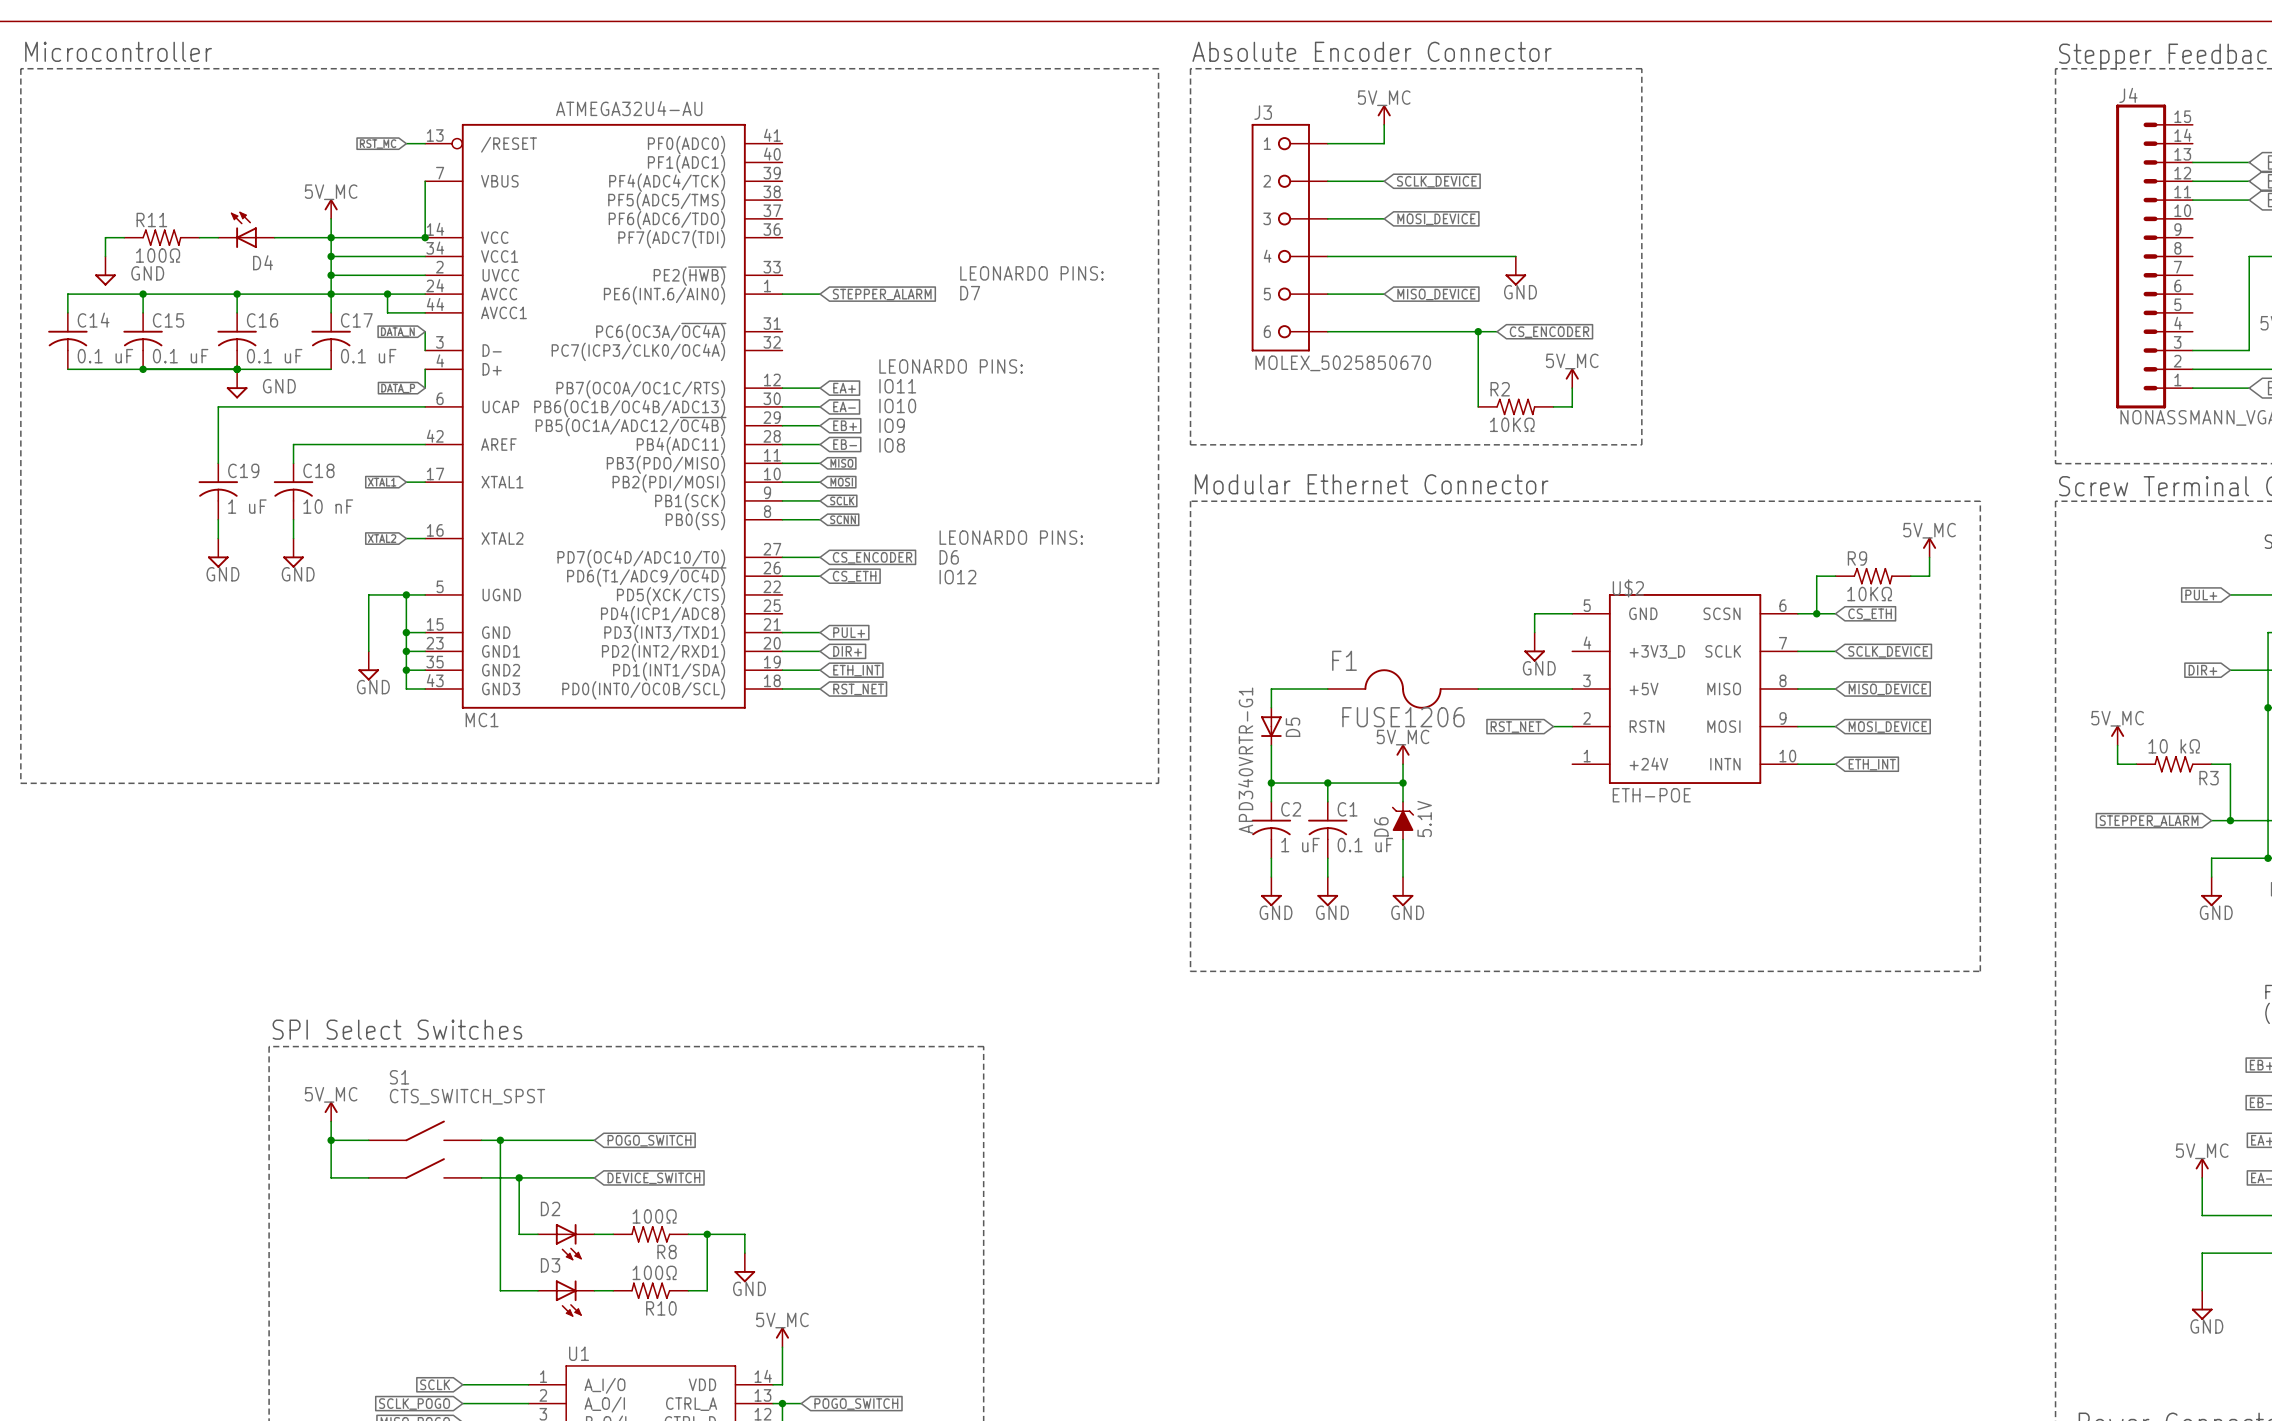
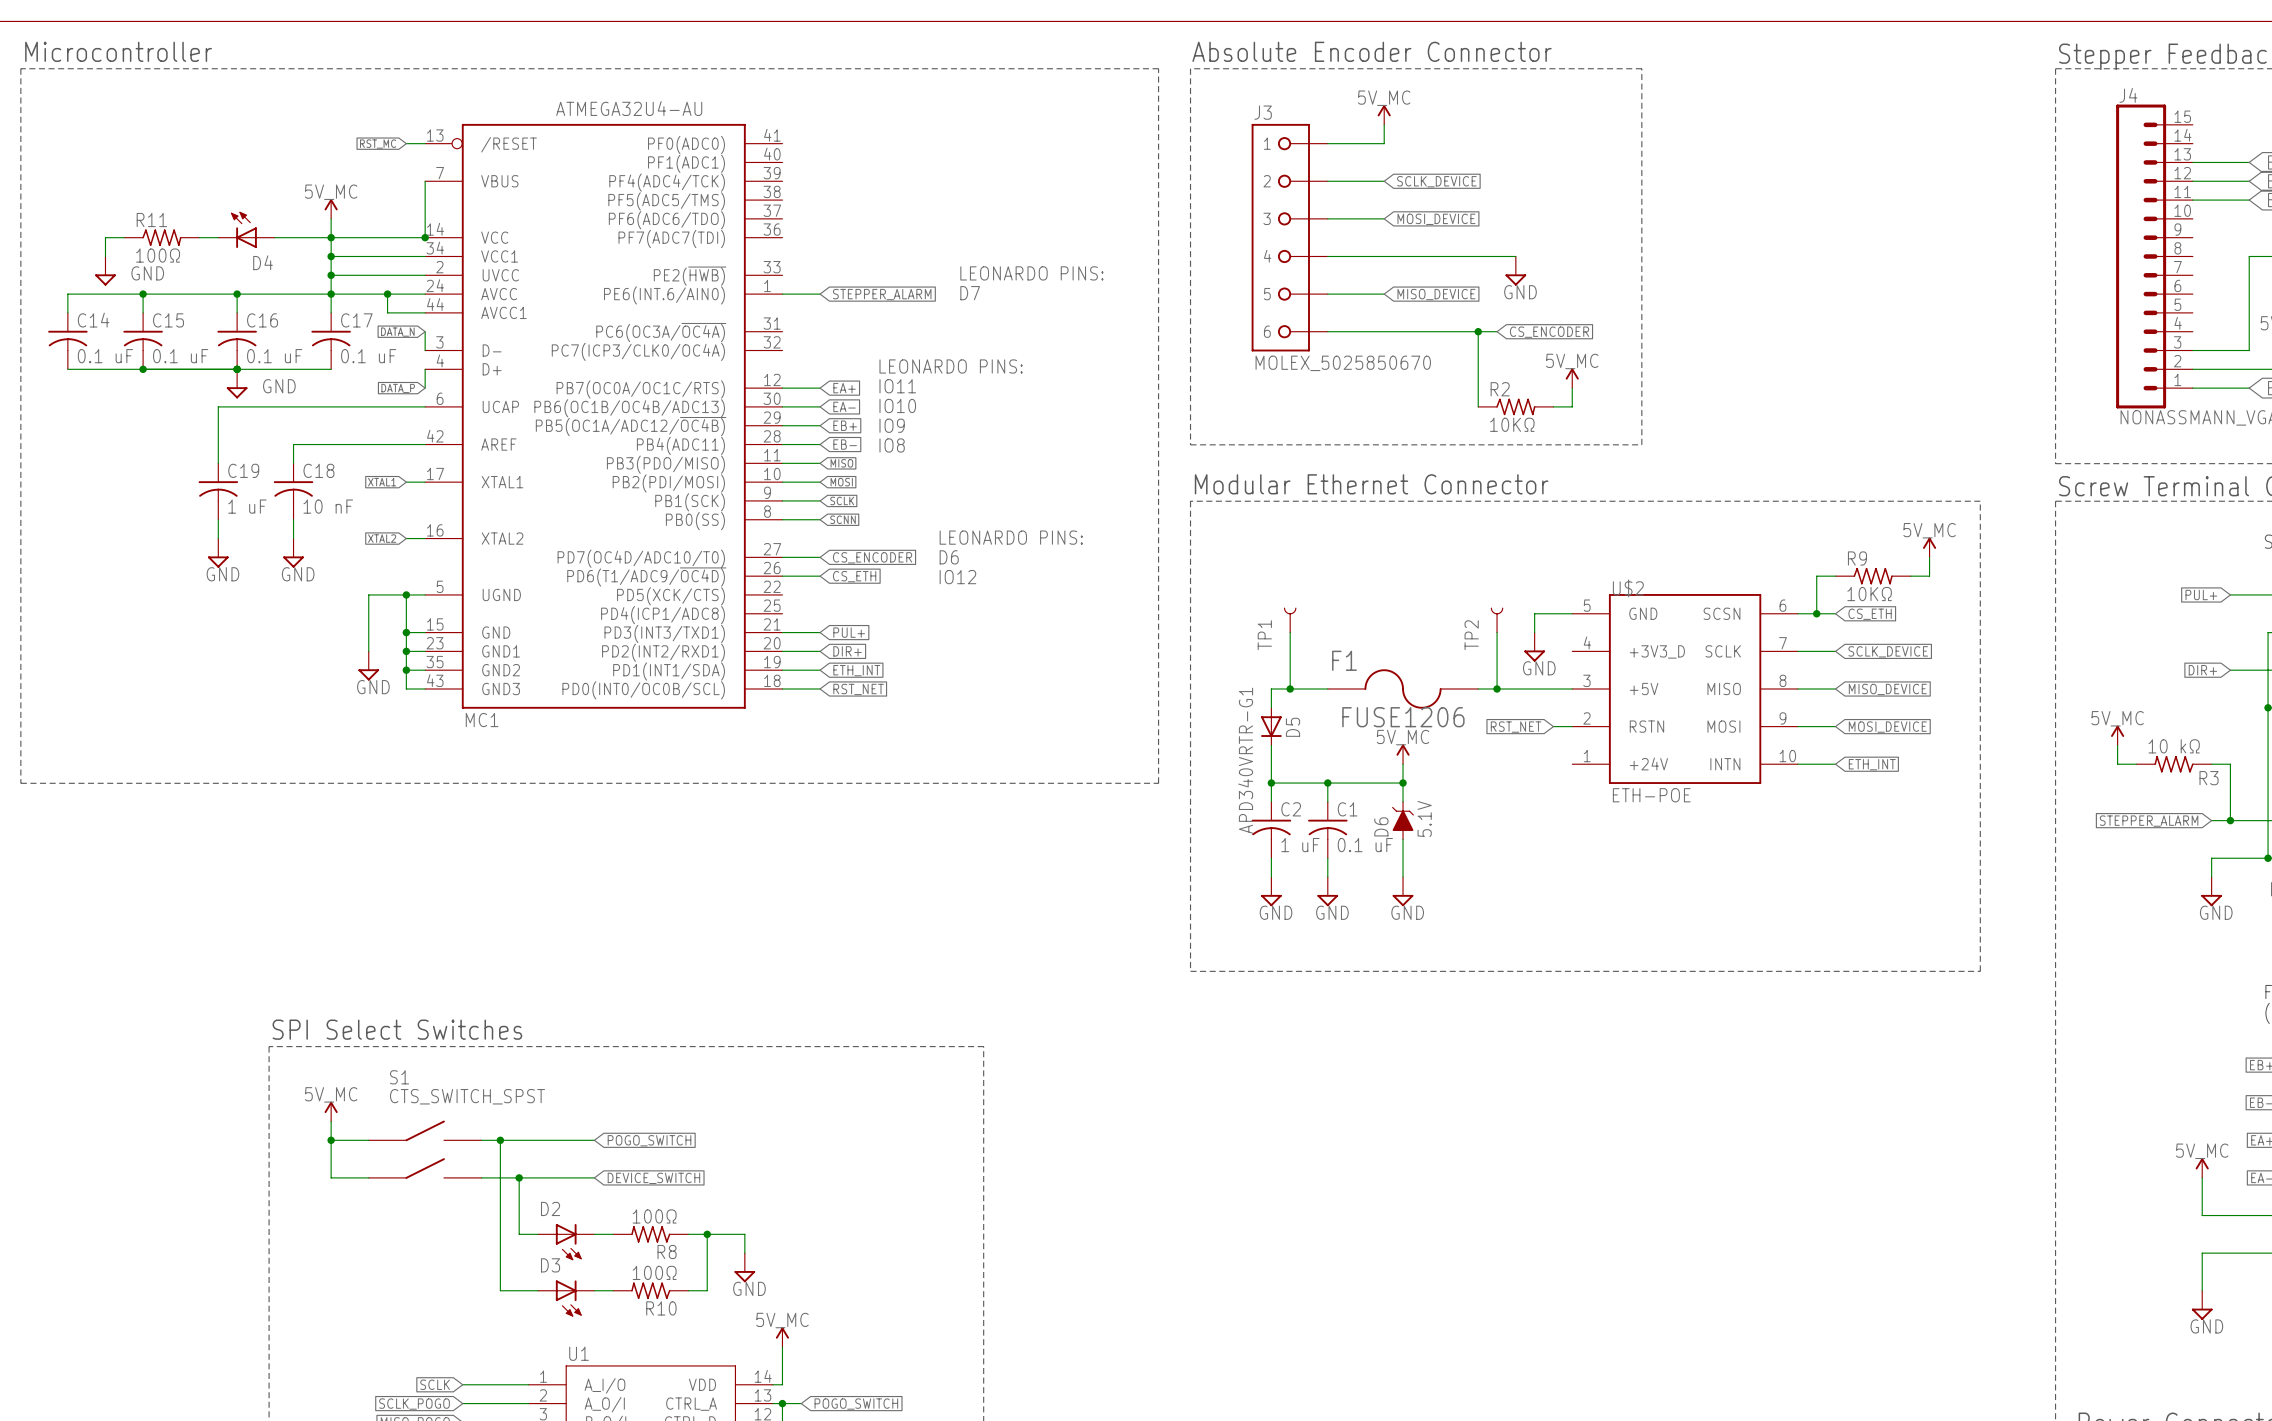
TP1: none -> (1290, 620)
TP2: none -> (1497, 620)
wire: none -> (1290, 632) (1290, 689)
wire: none -> (1497, 632) (1497, 689)
junction: none -> (1290, 689)
junction: none -> (1497, 689)

